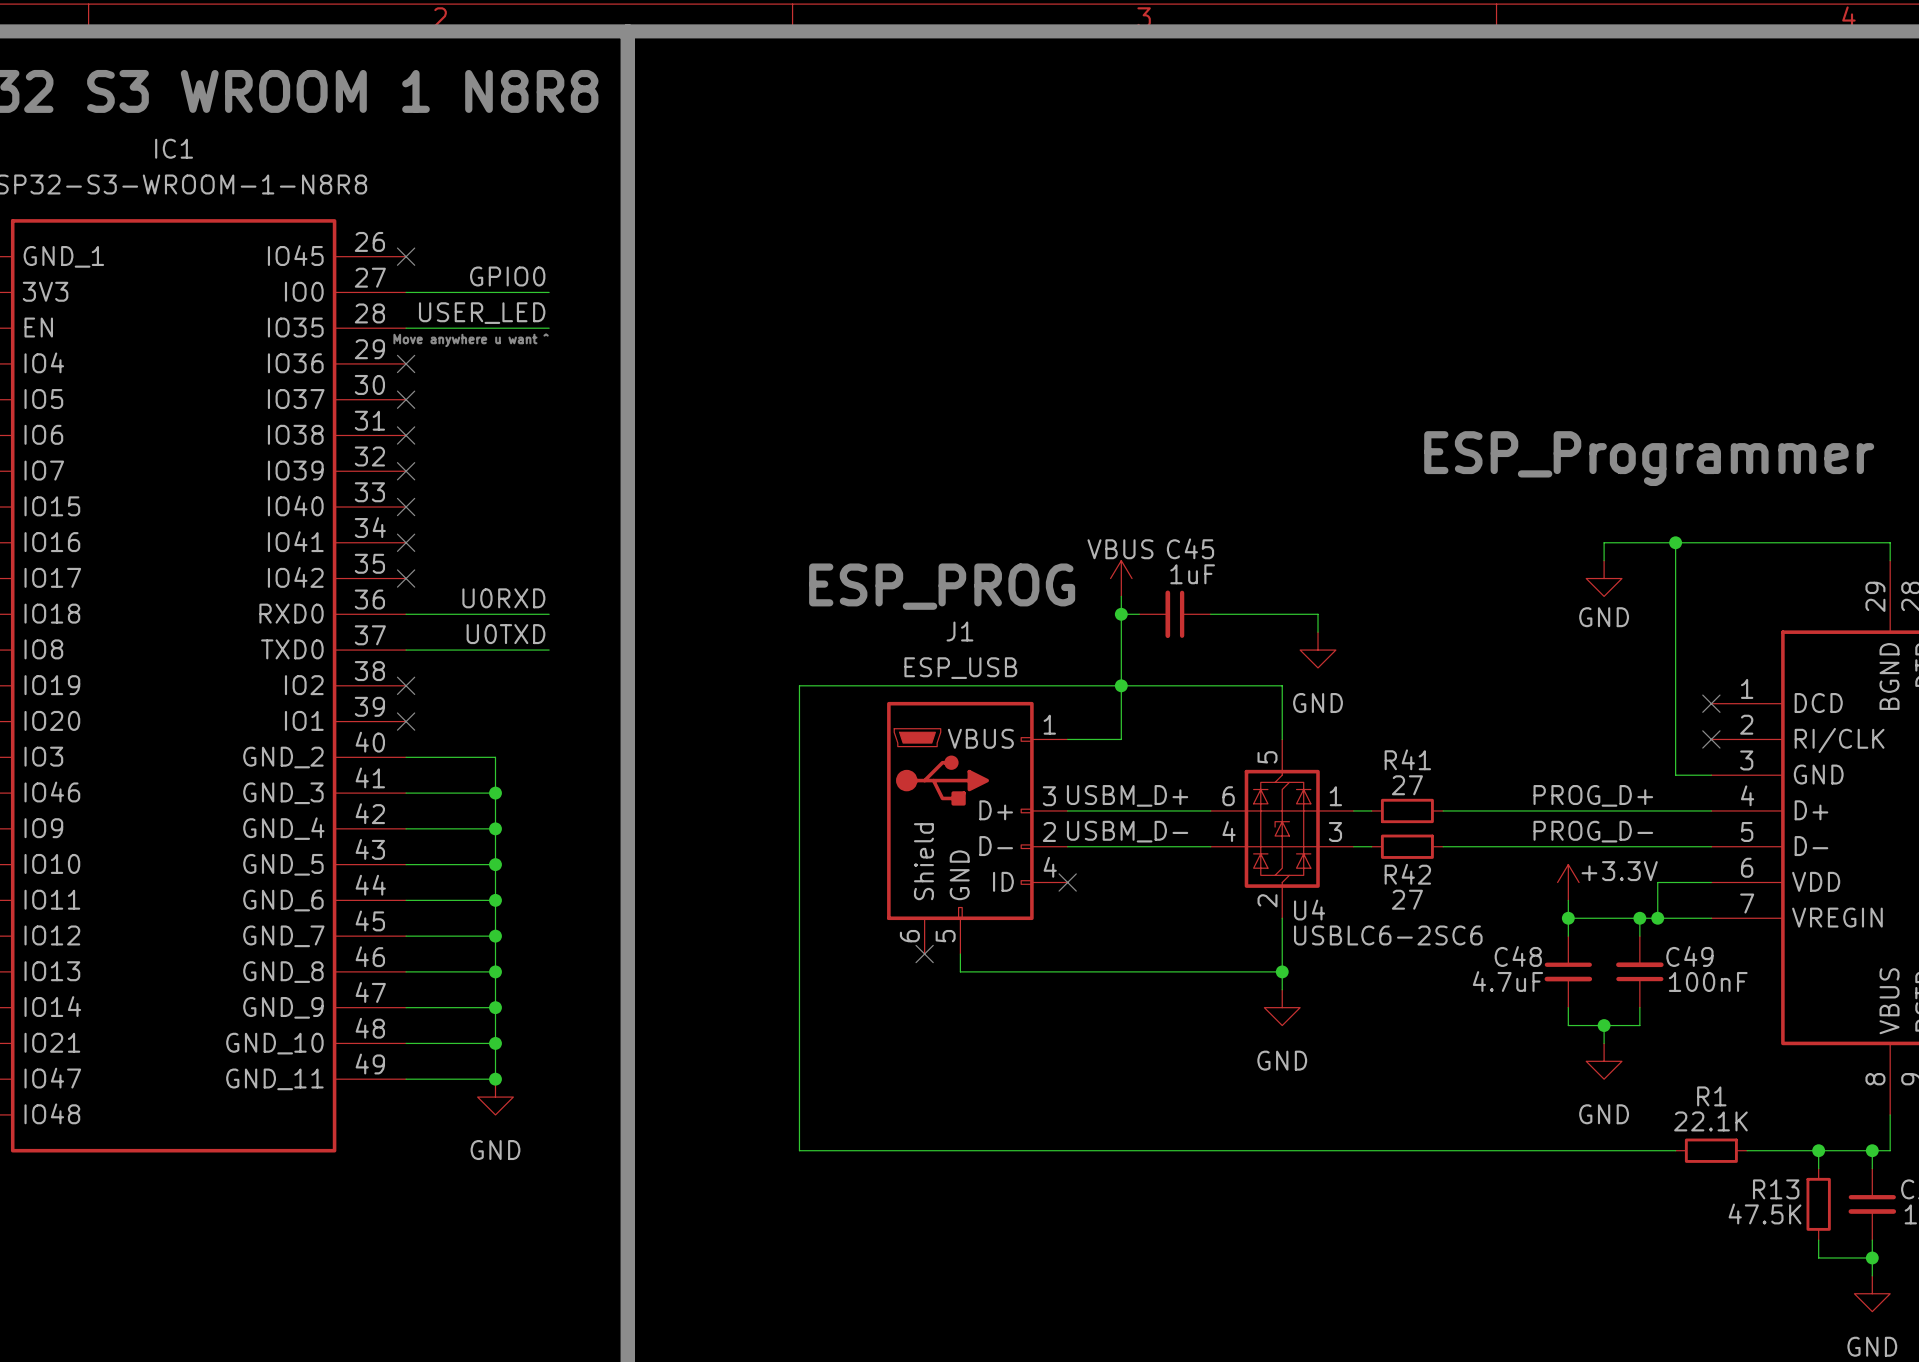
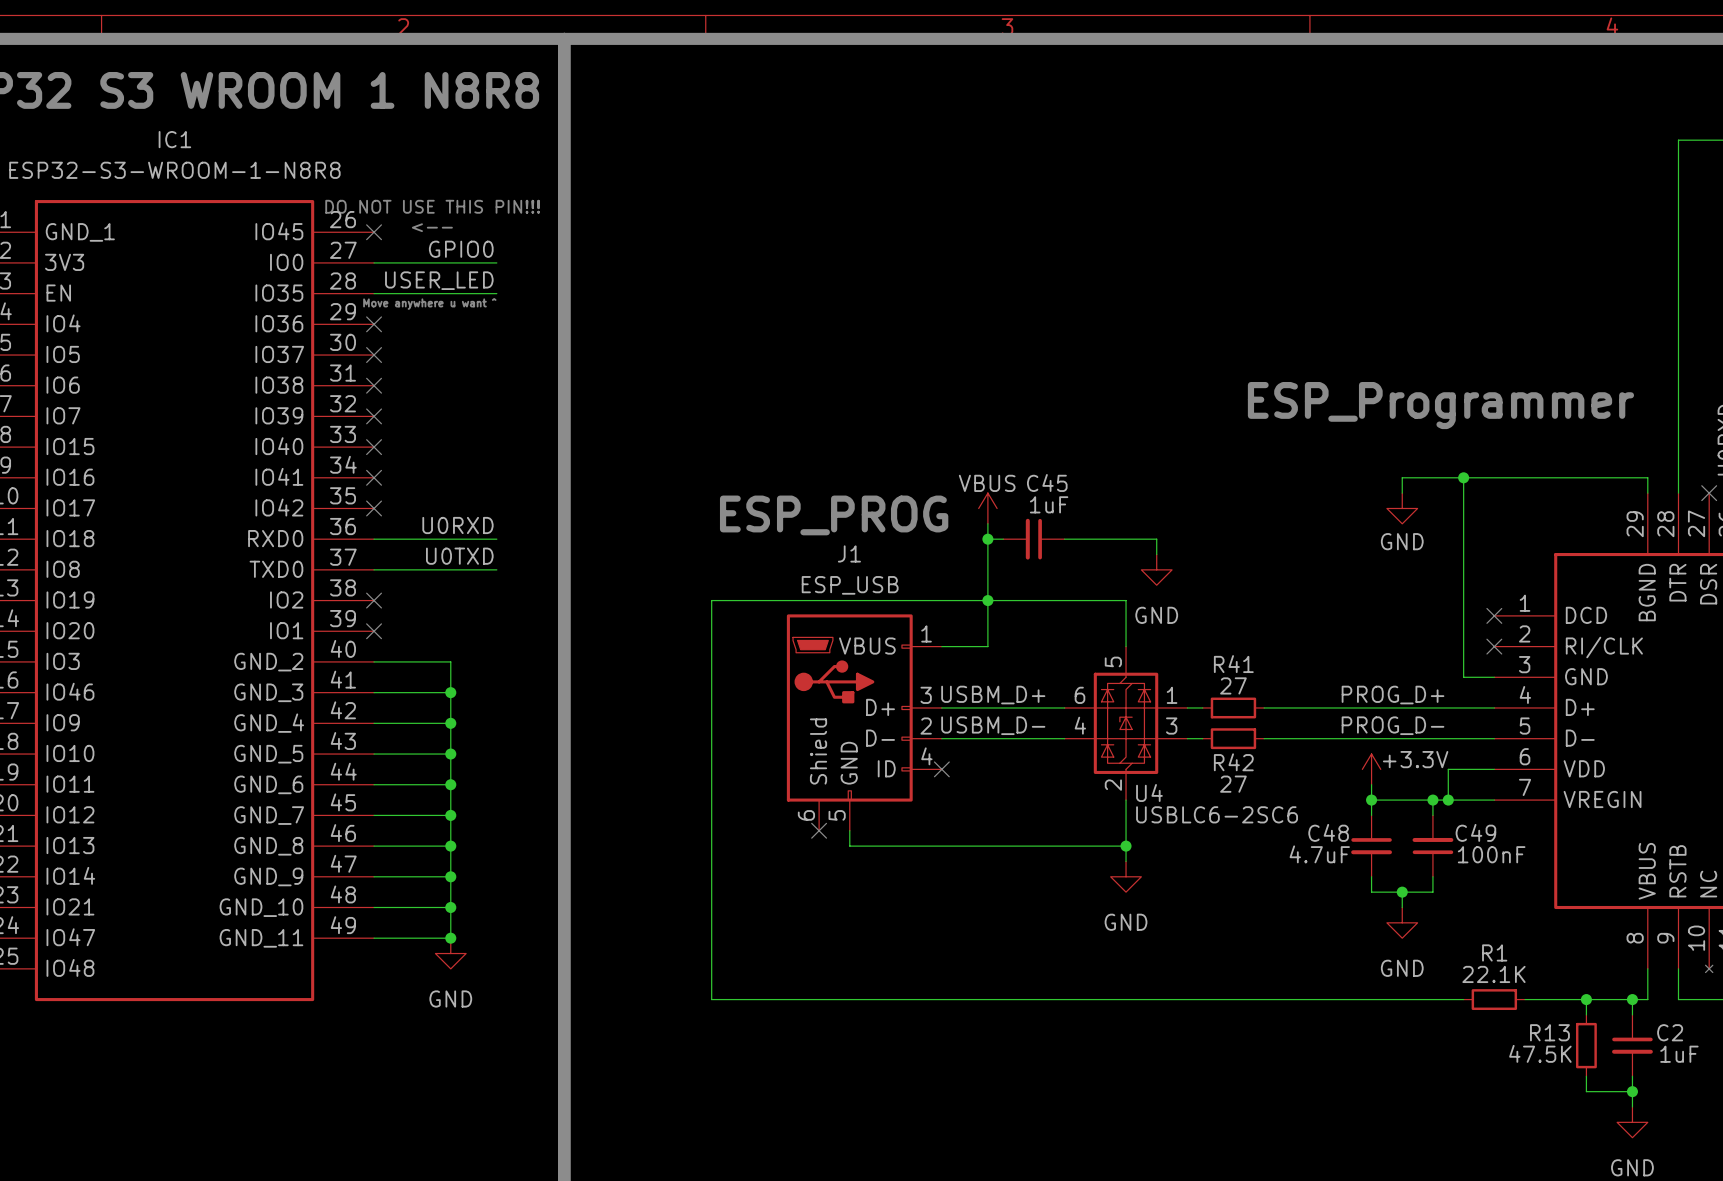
text: none -> DO NOT USE THIS PIN!!! (432, 206)
text: none -> <-- (432, 227)

